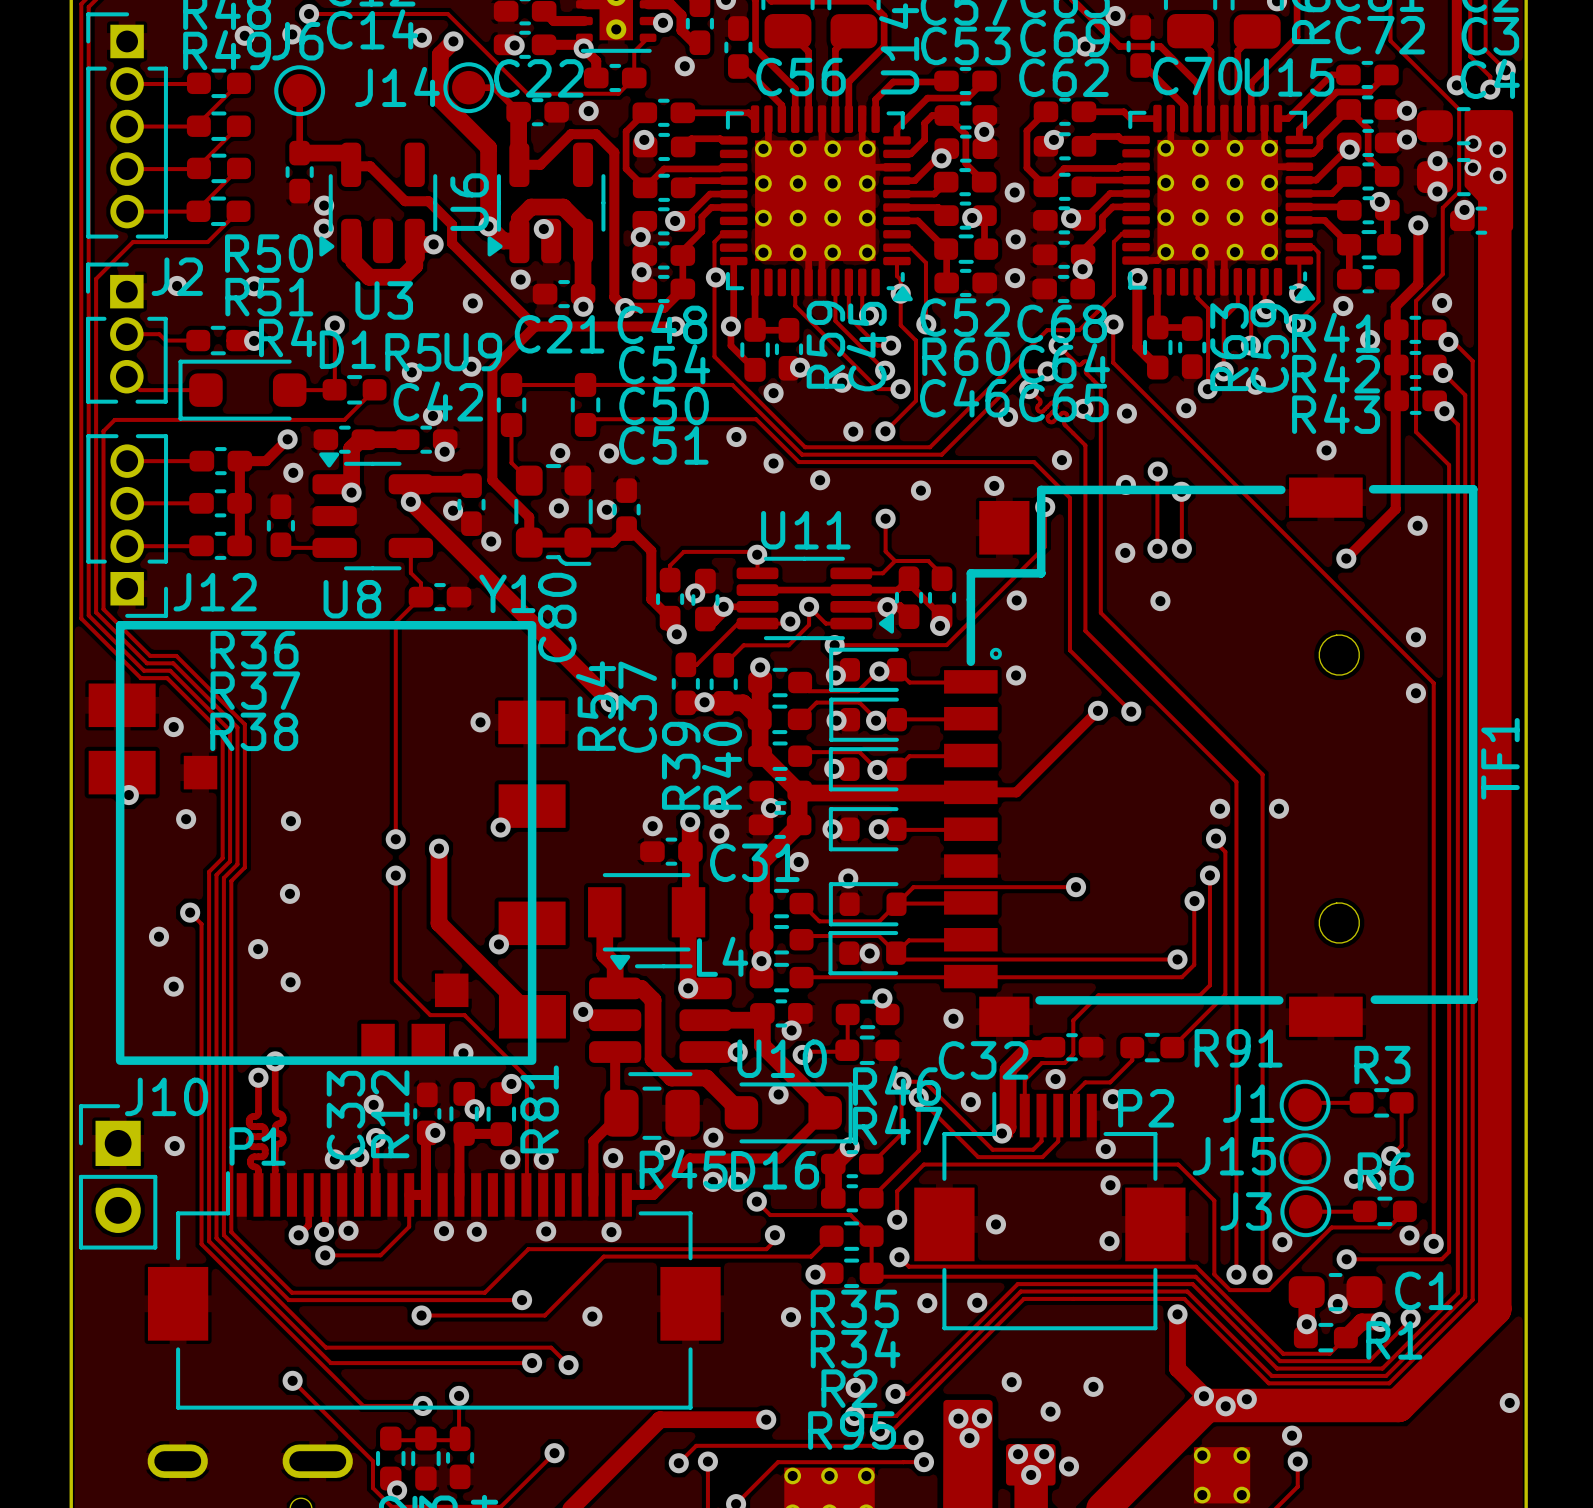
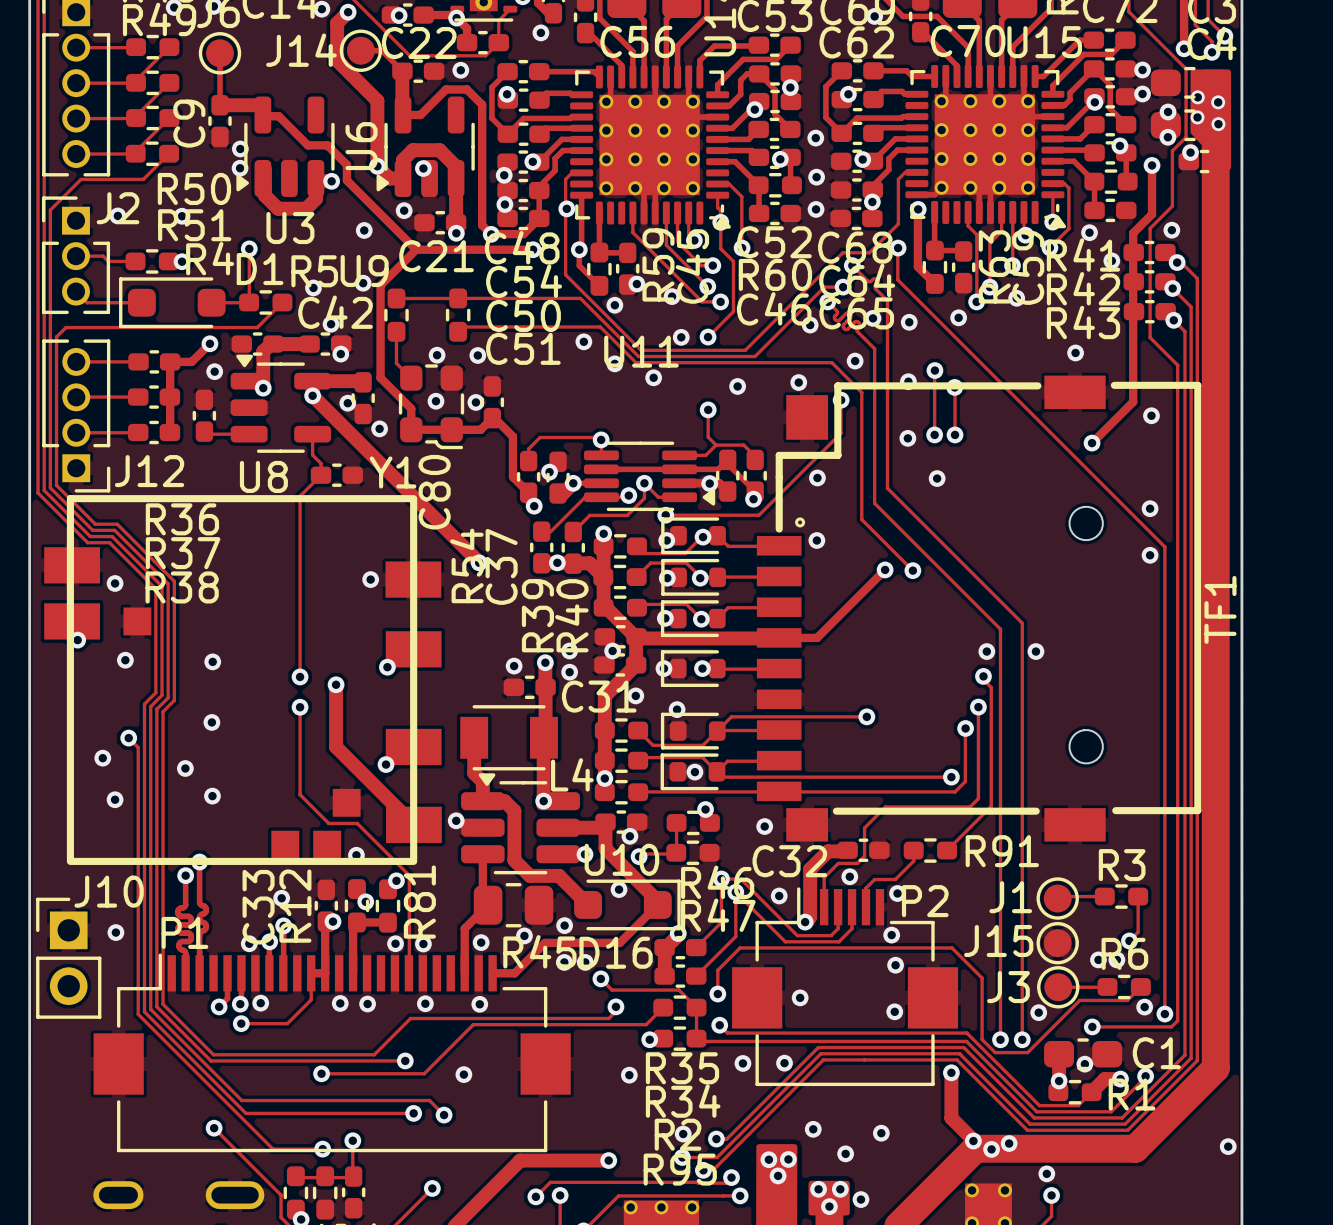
C9 name: none -> C9 (189, 123)
U11 name position: U11 (805, 530) -> U11 (641, 351)

